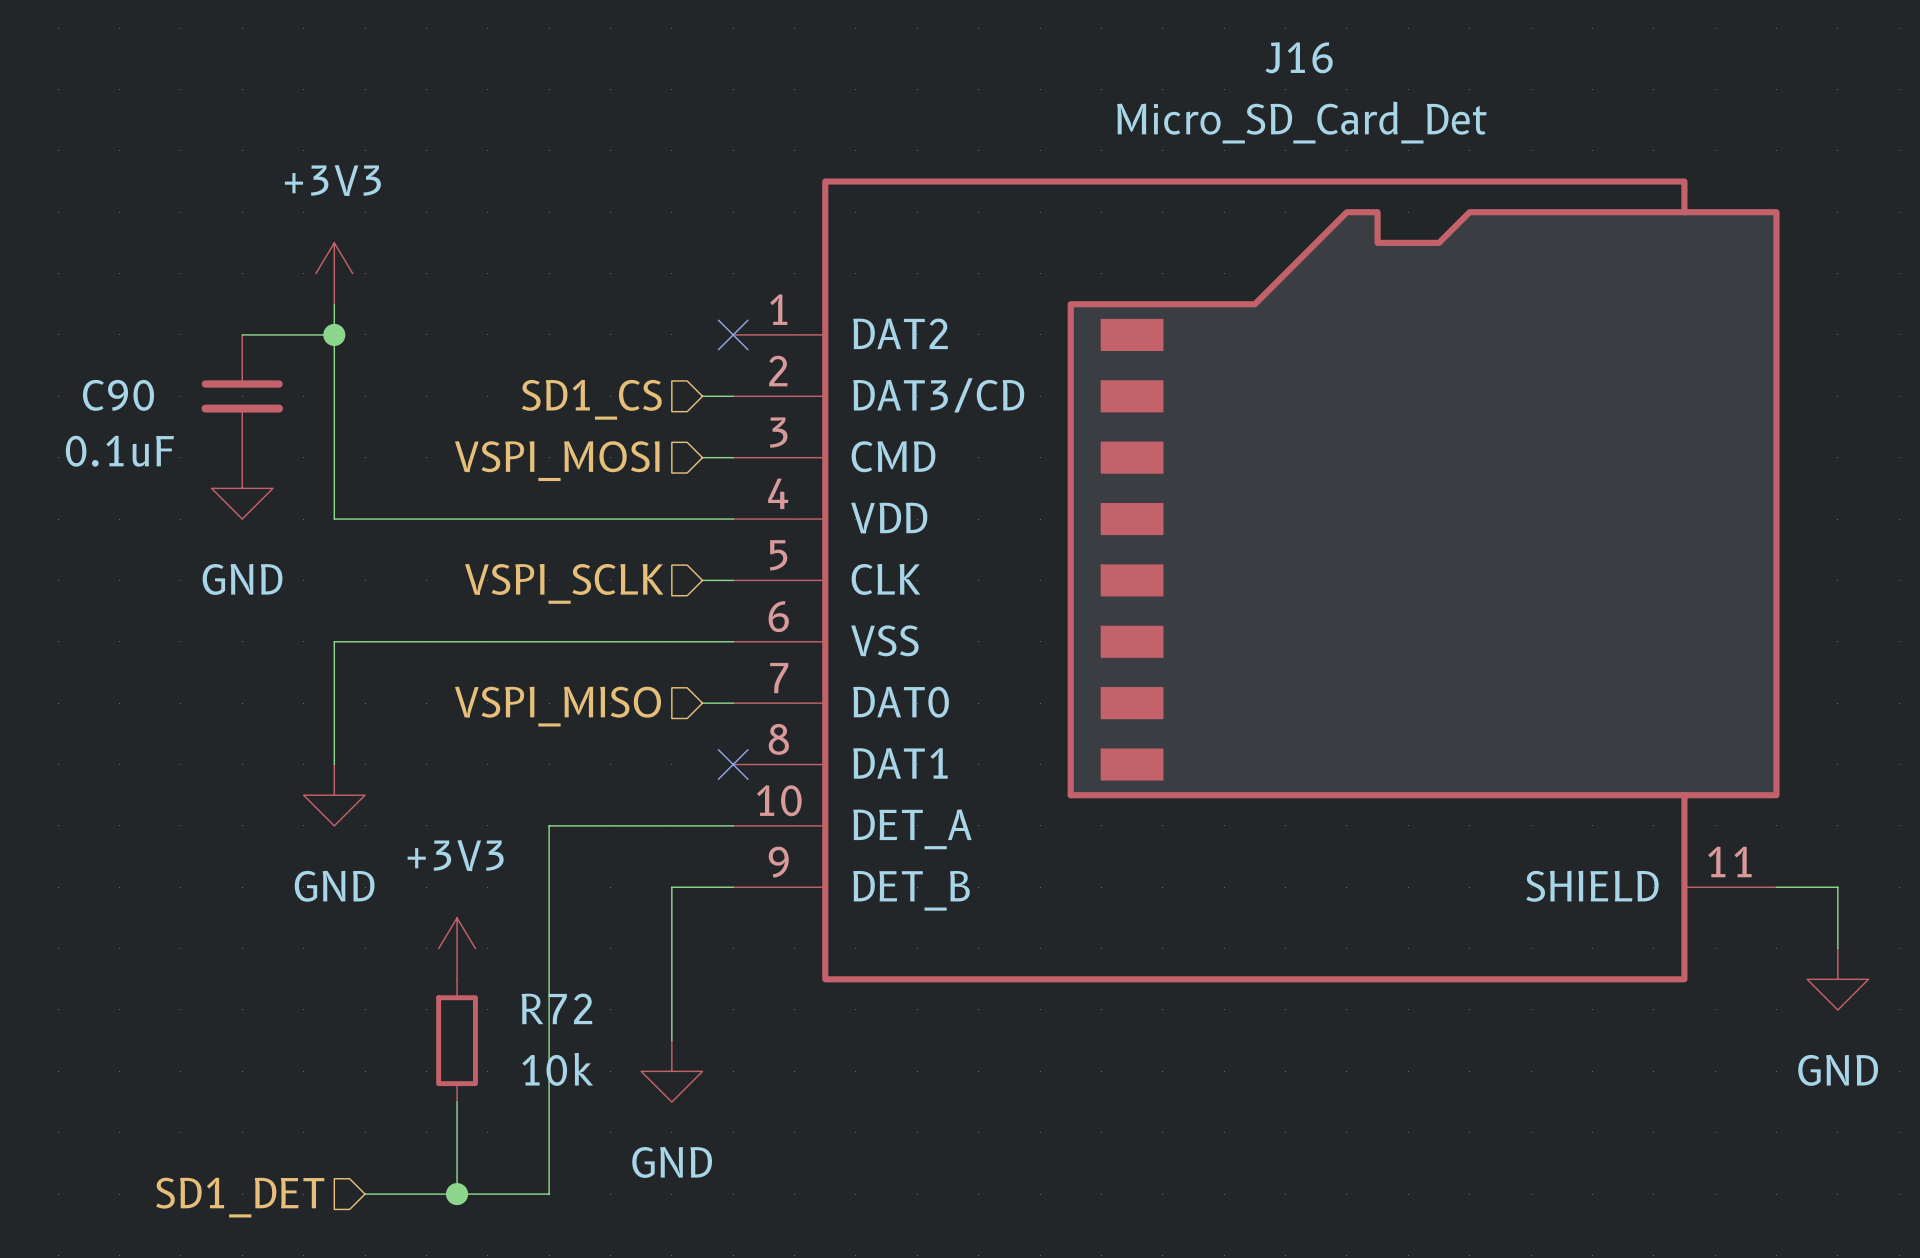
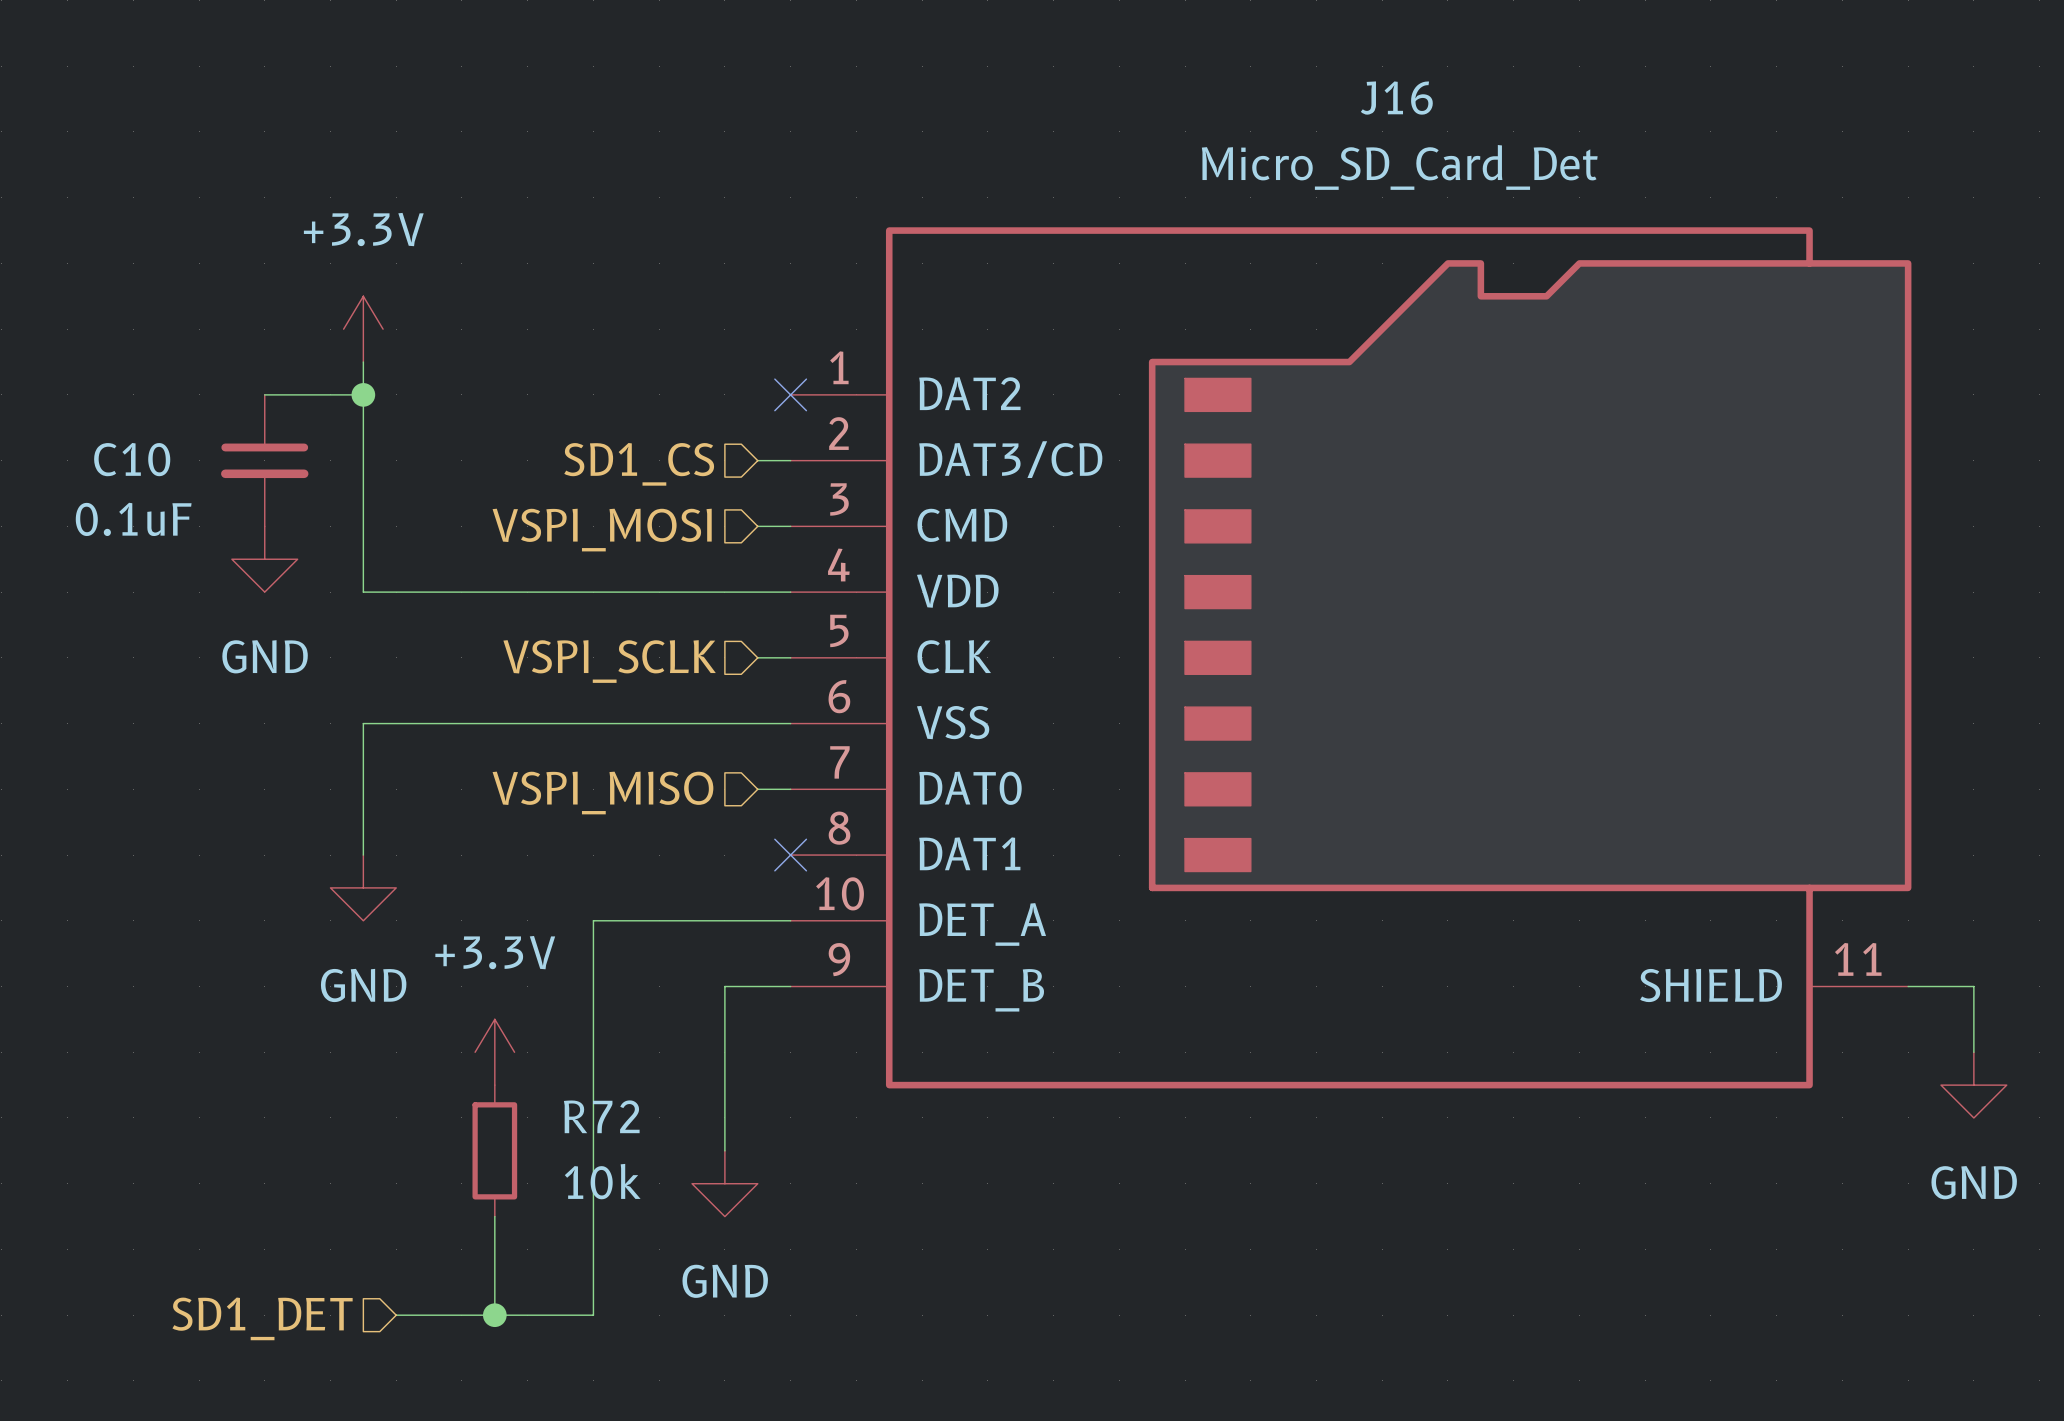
power symbol: +3V3 (334, 273) -> +3.3V (363, 329)
C90 name: C90 (118, 395) -> C10 (132, 459)
power symbol: +3V3 (457, 948) -> +3.3V (494, 1052)

